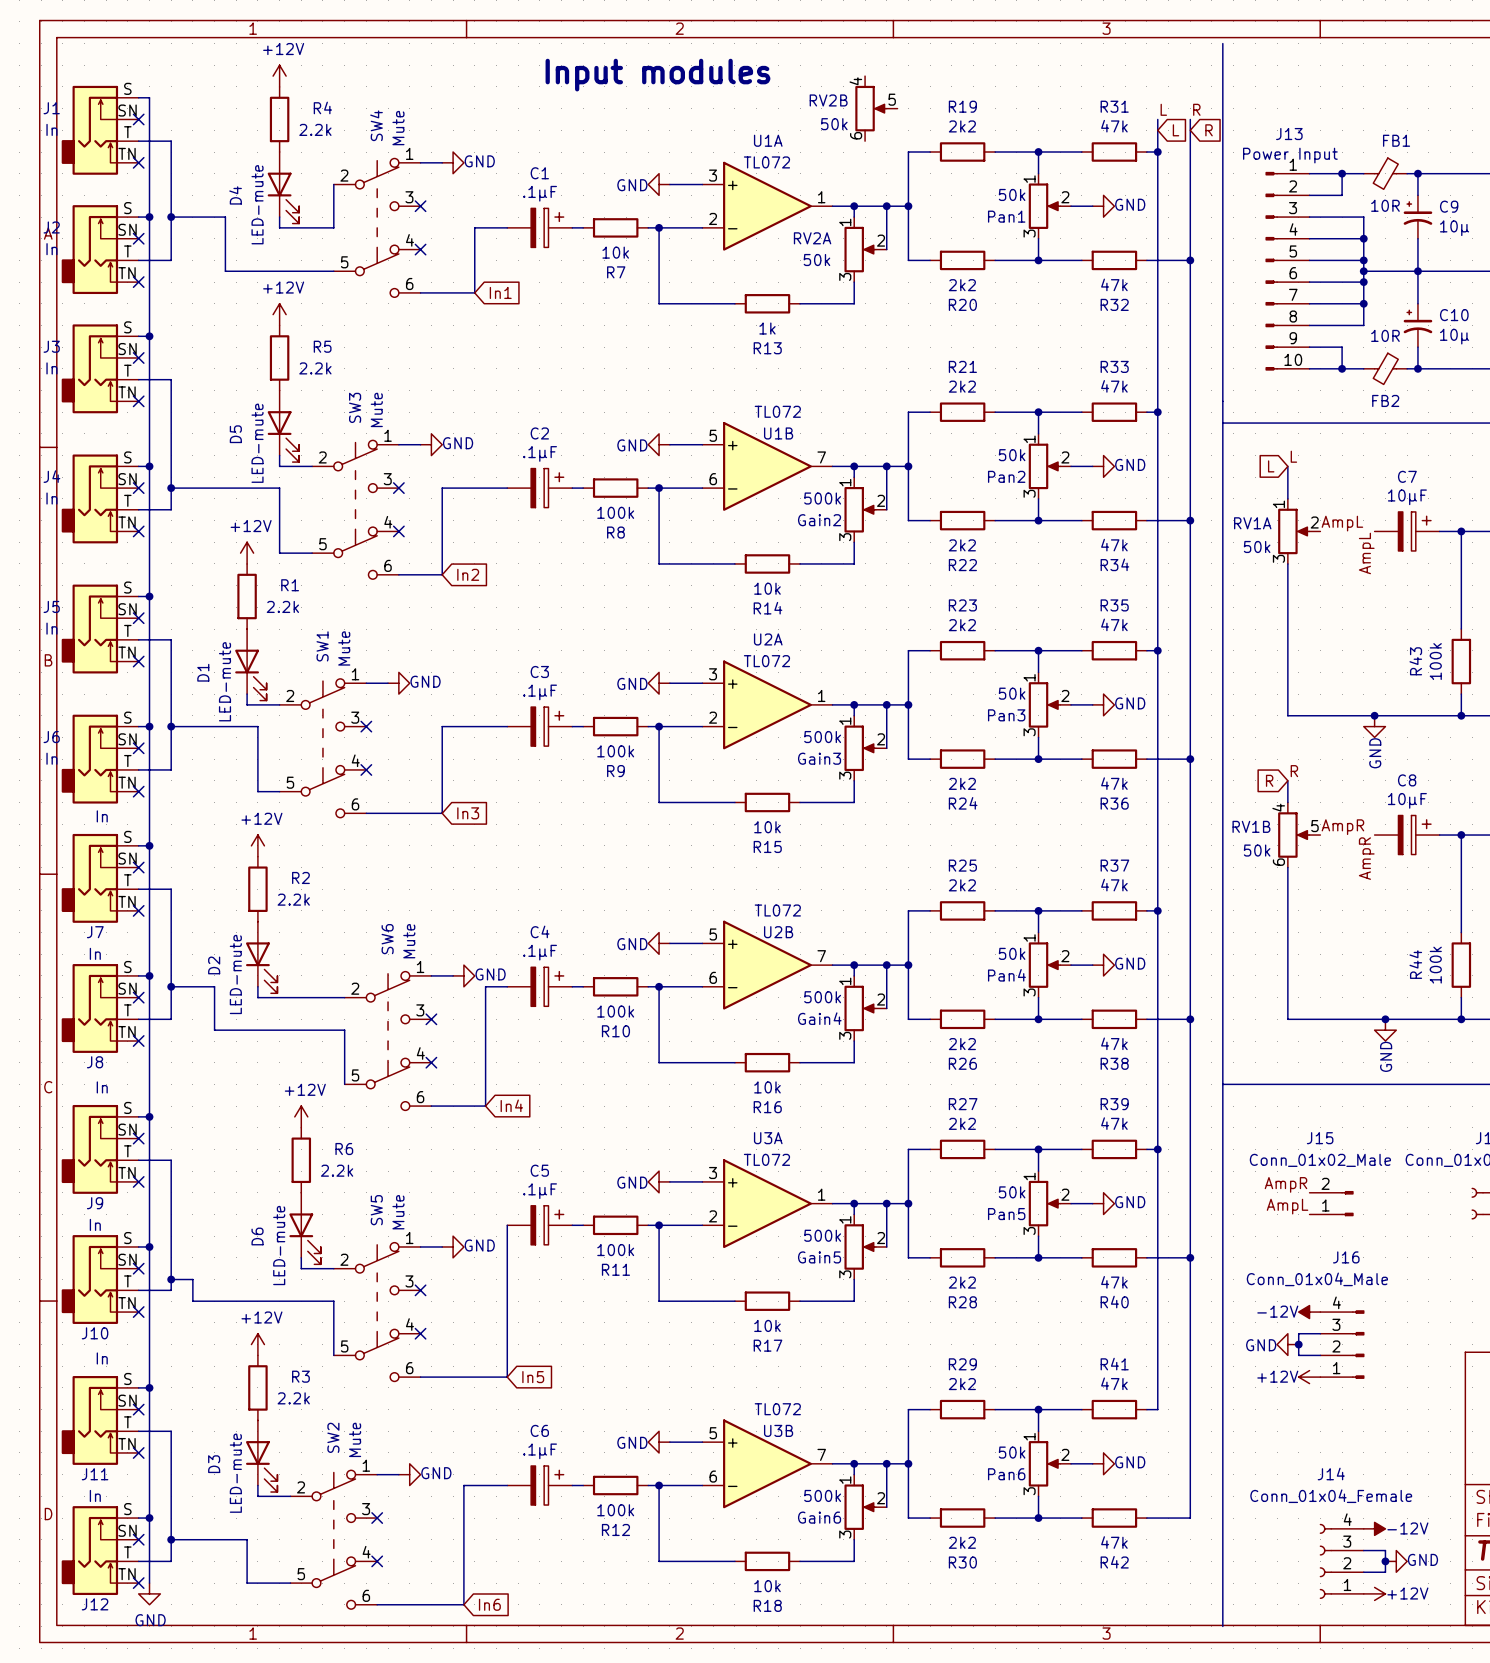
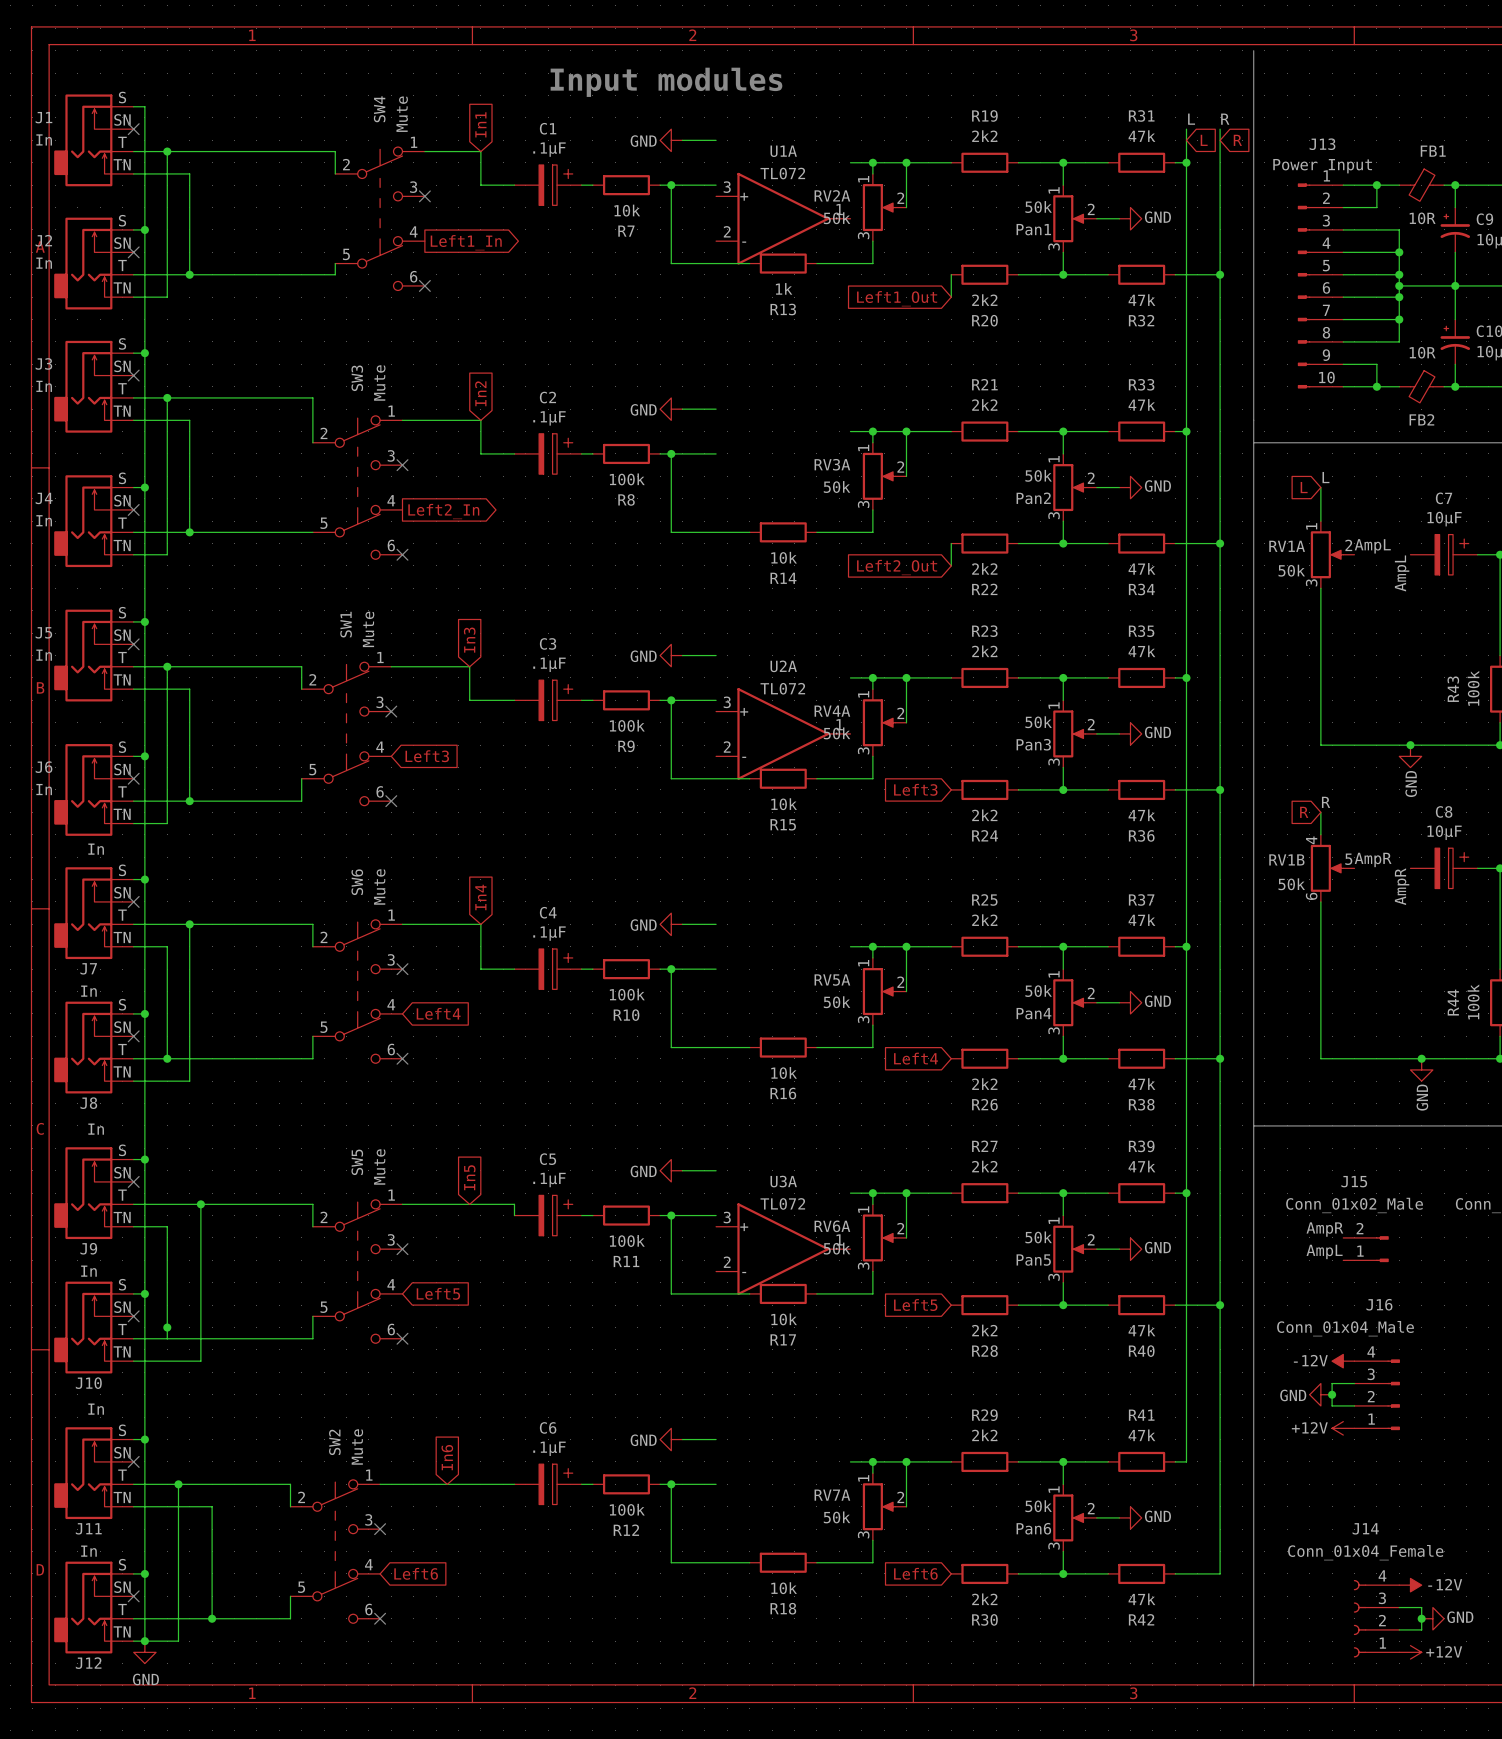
power symbol: +12V (279, 76) -> none
RV2B: 50k (876, 108) -> none
R4: 2.2k (279, 119) -> none
wire: none -> (167, 151) (335, 151) (335, 173)
junction: none -> (167, 151)
wire: none -> (424, 151) (480, 151) (480, 185) (514, 185)
junction: none -> (872, 162)
junction: none -> (906, 162)
wire: (908, 152) (908, 260) (930, 260) -> (951, 297) (951, 274)
wire: none -> (133, 173) (189, 173) (189, 274)
no-connect mark: (138, 162) -> none
wire: (420, 162) (442, 162) -> none
power symbol: GND (453, 162) -> none
wire: none -> (671, 185) (671, 241)
junction: none -> (671, 185)
wire: (333, 184) (333, 227) (279, 227) (279, 217) -> none
power symbol position: GND (659, 184) -> GND (671, 140)
wire: (669, 184) (702, 184) -> (682, 140) (716, 140)
D4: LED-mute (283, 187) -> none
no-connect mark position: (420, 206) -> (424, 196)
wire: (832, 206) (908, 206) -> (850, 162) (928, 162)
wire: (854, 206) (854, 217) -> (872, 162) (872, 173)
junction: (854, 206) -> none
wire: (886, 206) (886, 249) -> (906, 162) (906, 207)
junction: (886, 206) -> none
junction: (908, 206) -> none
wire: (171, 217) (225, 217) (225, 271) (333, 271) -> none
junction: (171, 217) -> none
SW4 position: (377, 227) -> (380, 218)
wire: (507, 227) (474, 227) (474, 292) (420, 292) -> none
C1 position: (539, 227) -> (548, 185)
wire: (572, 227) (583, 227) -> (581, 185) (592, 185)
R7 position: (615, 227) -> (626, 185)
wire: (648, 227) (702, 227) -> (660, 185) (716, 185)
junction: (659, 227) -> none
global label: none -> Left1_In (466, 242)
wire: none -> (335, 263) (335, 274) (167, 274) (167, 297) (133, 297)
no-connect mark position: (420, 249) -> (424, 285)
wire: (659, 249) (659, 303) (734, 303) -> (671, 263) (749, 263)
RV2A position: (865, 249) -> (884, 207)
junction: none -> (189, 274)
no-connect mark: (138, 282) -> none
wire: (854, 282) (854, 303) (800, 303) -> (872, 241) (872, 263) (816, 263)
global label: none -> Left1_Out (897, 298)
global label rotation: 0° (500, 292) -> 90° counterclockwise (480, 124)
global label position: In1 (500, 292) -> In1 (480, 124)
R13 position: (767, 303) -> (783, 263)
power symbol: +12V (279, 314) -> none
R5: 2.2k (279, 357) -> none
wire: none -> (167, 397) (312, 397) (312, 442)
junction: none -> (167, 397)
wire: none -> (133, 420) (189, 420) (189, 532)
no-connect mark: (138, 401) -> none
wire: none -> (402, 420) (480, 420) (480, 453) (514, 453)
junction: none -> (872, 431)
junction: none -> (906, 431)
wire: (908, 412) (908, 520) (930, 520) -> (951, 565) (951, 543)
D5: LED-mute (283, 426) -> none
wire: none -> (671, 453) (671, 509)
junction: none -> (671, 453)
wire: (398, 444) (420, 444) -> none
power symbol: GND (431, 444) -> none
power symbol position: GND (659, 444) -> GND (671, 409)
wire: (669, 444) (702, 444) -> (682, 409) (716, 409)
wire: (279, 455) (279, 466) (312, 466) -> none
RV3A: none -> 50k (884, 476)
U1B: TL072 (767, 466) -> none
wire: (832, 466) (908, 466) -> (850, 431) (928, 431)
wire: (854, 466) (854, 477) -> (872, 431) (872, 442)
junction: (854, 466) -> none
wire: (886, 466) (886, 509) -> (906, 431) (906, 476)
junction: (886, 466) -> none
junction: (908, 466) -> none
wire: (171, 488) (279, 488) (279, 553) (312, 553) -> none
junction position: (171, 488) -> (189, 532)
no-connect mark position: (398, 488) -> (402, 465)
global label: none -> Left2_In (443, 511)
wire: (507, 488) (442, 488) (442, 574) (398, 574) -> none
C2 position: (539, 488) -> (548, 453)
wire: (572, 488) (583, 488) -> (581, 453) (592, 453)
R8 position: (615, 488) -> (626, 453)
wire: (648, 488) (702, 488) -> (660, 453) (716, 453)
junction: (659, 488) -> none
wire: none -> (312, 532) (167, 532) (167, 554) (133, 554)
SW3 position: (355, 509) -> (357, 487)
wire: (659, 509) (659, 563) (734, 563) -> (671, 532) (749, 532)
Gain2: 500k (865, 509) -> none
no-connect mark: (138, 531) -> none
wire: (854, 542) (854, 563) (800, 563) -> (872, 509) (872, 532) (816, 532)
global label: none -> Left2_Out (897, 567)
power symbol: +12V (247, 553) -> none
R14 position: (767, 563) -> (783, 532)
global label rotation: 0° (468, 574) -> 90° counterclockwise (480, 393)
global label position: In2 (468, 574) -> In2 (480, 393)
R1: 2.2k (247, 596) -> none
wire: none -> (167, 666) (301, 666) (301, 689)
junction: none -> (167, 666)
wire: none -> (391, 666) (469, 666) (469, 700) (514, 700)
junction: none -> (872, 677)
junction: none -> (906, 677)
wire: (908, 650) (908, 759) (930, 759) -> (928, 677) (850, 677)
wire: none -> (133, 689) (189, 689) (189, 801)
no-connect mark: (138, 661) -> none
D1: LED-mute (250, 664) -> none
wire: none -> (671, 700) (671, 756)
junction: none -> (671, 700)
no-connect mark: none -> (391, 711)
power symbol: GND (398, 683) -> none
power symbol position: GND (659, 683) -> GND (671, 655)
wire: (669, 683) (702, 683) -> (682, 655) (716, 655)
wire: (247, 694) (247, 704) (279, 704) -> none
RV4A: none -> 50k (884, 722)
wire: (832, 704) (908, 704) -> none
wire: (854, 704) (854, 715) -> (872, 677) (872, 689)
junction: (854, 704) -> none
wire: (886, 704) (886, 748) -> (906, 677) (906, 722)
junction: (886, 704) -> none
junction: (908, 704) -> none
wire: (171, 726) (257, 726) (257, 791) (279, 791) -> none
junction: (171, 726) -> none
no-connect mark: (366, 726) -> none
global label: none -> Left3 (427, 756)
wire: (507, 726) (442, 726) (442, 813) (366, 813) -> none
C3 position: (539, 726) -> (548, 700)
wire: (572, 726) (583, 726) -> (581, 700) (592, 700)
R9 position: (615, 726) -> (626, 700)
wire: (648, 726) (702, 726) -> (660, 700) (716, 700)
junction: (659, 726) -> none
wire: none -> (301, 778) (301, 801) (167, 801) (167, 823) (133, 823)
SW1 position: (322, 748) -> (346, 733)
wire: (659, 748) (659, 802) (734, 802) -> (671, 778) (749, 778)
Gain3: 500k (865, 748) -> none
global label: none -> Left3 (915, 789)
junction: none -> (189, 801)
no-connect mark position: (366, 769) -> (391, 801)
wire: (854, 780) (854, 802) (800, 802) -> (872, 756) (872, 778) (816, 778)
no-connect mark: (138, 791) -> none
R15 position: (767, 802) -> (783, 778)
global label rotation: 0° (468, 813) -> 90° counterclockwise (469, 640)
global label position: In3 (468, 813) -> In3 (469, 640)
power symbol: +12V (257, 845) -> none
global label: none -> In4 (480, 897)
wire: (171, 889) (171, 910) -> (133, 946) (167, 946)
wire: none -> (167, 924) (312, 924) (312, 946)
wire: none -> (189, 924) (189, 1081) (133, 1081)
junction: none -> (189, 924)
R2: 2.2k (257, 889) -> none
wire: none -> (402, 924) (480, 924) (480, 969) (514, 969)
no-connect mark: (138, 910) -> none
junction: none -> (872, 946)
junction: none -> (906, 946)
wire: (908, 910) (908, 1019) (930, 1019) -> (928, 946) (850, 946)
no-connect mark: none -> (402, 969)
wire: none -> (671, 969) (671, 1025)
junction: none -> (671, 969)
power symbol position: GND (659, 943) -> GND (671, 924)
wire: (669, 943) (702, 943) -> (682, 924) (716, 924)
RV5A: none -> 50k (884, 991)
D2: LED-mute (261, 957) -> none
U2B: TL072 (767, 965) -> none
wire: (832, 965) (908, 965) -> none
wire: (854, 965) (854, 975) -> (872, 946) (872, 957)
junction: (854, 965) -> none
wire: (886, 965) (886, 1008) -> (906, 946) (906, 991)
junction: (886, 965) -> none
junction: (908, 965) -> none
wire: (431, 975) (453, 975) -> none
global label: none -> Left4 (438, 1013)
power symbol: GND (463, 975) -> none
wire: (171, 986) (214, 986) (214, 1030) (344, 1030) (344, 1084) -> none
junction position: (171, 986) -> (167, 1058)
wire: (257, 986) (257, 997) (344, 997) -> none
wire: (507, 986) (485, 986) (485, 1106) (431, 1106) -> none
C4 position: (539, 986) -> (548, 969)
wire: (572, 986) (583, 986) -> (581, 969) (592, 969)
R10 position: (615, 986) -> (626, 969)
wire: (648, 986) (702, 986) -> (660, 969) (716, 969)
junction: (659, 986) -> none
wire: none -> (312, 1036) (312, 1058) (167, 1058)
wire: (659, 1008) (659, 1062) (734, 1062) -> (671, 1047) (749, 1047)
Gain4: 500k (865, 1008) -> none
no-connect mark: none -> (402, 1058)
no-connect mark: (431, 1019) -> none
global label: none -> Left4 (916, 1058)
no-connect mark: (138, 1041) -> none
SW6 position: (388, 1041) -> (357, 991)
wire: (854, 1041) (854, 1062) (800, 1062) -> (872, 1025) (872, 1047) (816, 1047)
no-connect mark: (431, 1062) -> none
R16 position: (767, 1062) -> (783, 1047)
global label: In4 (511, 1105) -> none
power symbol: +12V (301, 1116) -> none
global label: none -> In5 (469, 1177)
junction: none -> (872, 1193)
junction: none -> (906, 1193)
wire: (908, 1149) (908, 1257) (930, 1257) -> (928, 1193) (850, 1193)
wire: (171, 1160) (171, 1181) -> (133, 1226) (167, 1226)
wire: none -> (167, 1204) (312, 1204) (312, 1226)
wire: none -> (200, 1204) (200, 1361) (133, 1361)
junction: none -> (200, 1204)
R6: 2.2k (301, 1160) -> none
wire: none -> (402, 1204) (514, 1204) (514, 1215)
wire: none -> (671, 1215) (671, 1271)
junction: none -> (671, 1215)
no-connect mark: (138, 1181) -> none
power symbol position: GND (659, 1181) -> GND (671, 1170)
wire: (669, 1181) (702, 1181) -> (682, 1170) (716, 1170)
RV6A: none -> 50k (884, 1237)
no-connect mark: none -> (402, 1249)
wire: (832, 1203) (908, 1203) -> none
wire: (854, 1203) (854, 1214) -> (872, 1193) (872, 1204)
junction: (854, 1203) -> none
wire: (886, 1203) (886, 1246) -> (906, 1193) (906, 1237)
junction: (886, 1203) -> none
junction: (908, 1203) -> none
wire: (507, 1225) (507, 1377) (420, 1377) -> none
C5 position: (539, 1225) -> (548, 1215)
wire: (572, 1225) (583, 1225) -> (581, 1215) (592, 1215)
R11 position: (615, 1225) -> (626, 1215)
wire: (648, 1225) (702, 1225) -> (660, 1215) (716, 1215)
junction: (659, 1225) -> none
D6: LED-mute (305, 1228) -> none
wire: (420, 1246) (442, 1246) -> none
global label: none -> Left5 (438, 1293)
power symbol: GND (453, 1246) -> none
wire: (659, 1246) (659, 1301) (734, 1301) -> (671, 1293) (749, 1293)
Gain5: 500k (865, 1246) -> none
wire: (301, 1257) (301, 1268) (333, 1268) -> none
global label: none -> Left5 (915, 1305)
wire: none -> (312, 1316) (312, 1338) (167, 1338)
wire: (171, 1279) (192, 1279) (192, 1301) (333, 1301) (333, 1355) -> none
wire: (854, 1279) (854, 1301) (800, 1301) -> (872, 1271) (872, 1293) (816, 1293)
no-connect mark position: (420, 1290) -> (402, 1338)
R17 position: (767, 1301) -> (783, 1293)
no-connect mark: (138, 1312) -> none
SW5 position: (377, 1312) -> (357, 1271)
no-connect mark: (420, 1333) -> none
power symbol: +12V (257, 1344) -> none
global label: In5 (533, 1377) -> none
R3: 2.2k (257, 1387) -> none
junction: none -> (872, 1461)
junction: none -> (906, 1461)
wire: (908, 1409) (908, 1518) (930, 1518) -> (928, 1461) (850, 1461)
wire: (171, 1431) (171, 1561) -> (167, 1484) (290, 1484) (290, 1506)
wire: none -> (178, 1484) (178, 1641) (133, 1641)
junction: none -> (178, 1484)
wire: none -> (380, 1484) (514, 1484)
wire: none -> (671, 1484) (671, 1540)
junction: none -> (671, 1484)
power symbol position: GND (659, 1442) -> GND (671, 1439)
wire: (669, 1442) (702, 1442) -> (682, 1439) (716, 1439)
wire: none -> (133, 1506) (212, 1506) (212, 1618)
no-connect mark: (138, 1452) -> none
RV7A: none -> 50k (884, 1506)
D3: LED-mute (261, 1456) -> none
U3B: TL072 (767, 1463) -> none
wire: (832, 1463) (908, 1463) -> none
wire: (854, 1463) (854, 1474) -> (872, 1461) (872, 1473)
junction: (854, 1463) -> none
wire: (886, 1463) (886, 1507) -> (906, 1461) (906, 1506)
junction: (886, 1463) -> none
junction: (908, 1463) -> none
wire: (377, 1474) (398, 1474) -> none
power symbol: GND (409, 1474) -> none
wire: (257, 1485) (257, 1496) (290, 1496) -> none
wire: (507, 1485) (463, 1485) (463, 1604) (377, 1604) -> none
C6 position: (539, 1485) -> (548, 1484)
wire: (572, 1485) (583, 1485) -> (581, 1484) (592, 1484)
R12 position: (615, 1485) -> (626, 1484)
wire: (648, 1485) (702, 1485) -> (660, 1484) (716, 1484)
junction: (659, 1485) -> none
wire: (659, 1507) (659, 1561) (734, 1561) -> (671, 1562) (749, 1562)
Gain6: 500k (865, 1507) -> none
no-connect mark position: (377, 1518) -> (380, 1529)
global label: none -> Left6 (416, 1573)
global label: none -> Left6 (915, 1573)
wire: (171, 1539) (247, 1539) (247, 1583) (290, 1583) -> none
junction: (171, 1539) -> none
wire: none -> (290, 1596) (290, 1618) (167, 1618)
SW2 position: (333, 1539) -> (335, 1551)
wire: (854, 1539) (854, 1561) (800, 1561) -> (872, 1540) (872, 1562) (816, 1562)
junction: none -> (212, 1618)
R18 position: (767, 1561) -> (783, 1562)
no-connect mark: (138, 1583) -> none
junction: none -> (144, 1641)
global label rotation: 0° (489, 1604) -> 90° counterclockwise (447, 1457)
global label position: In6 (489, 1604) -> In6 (447, 1457)

